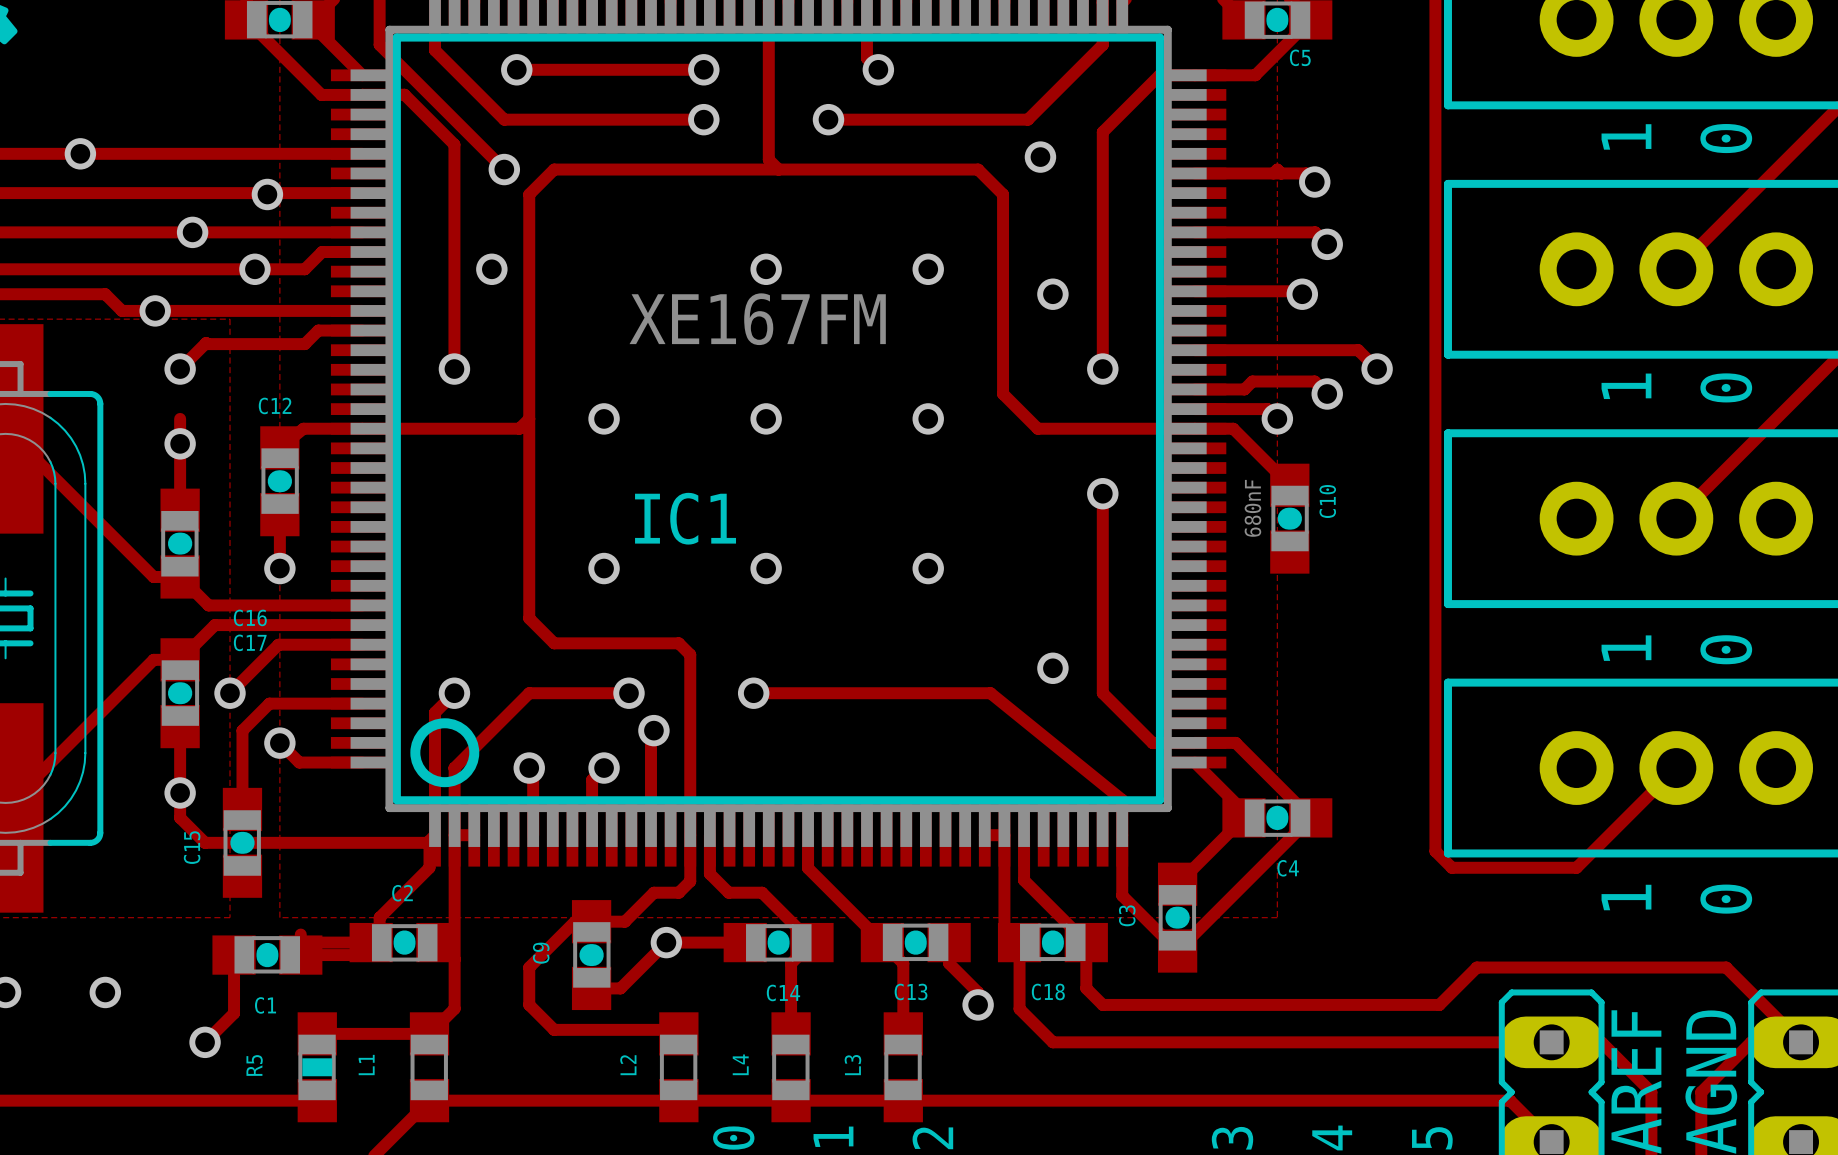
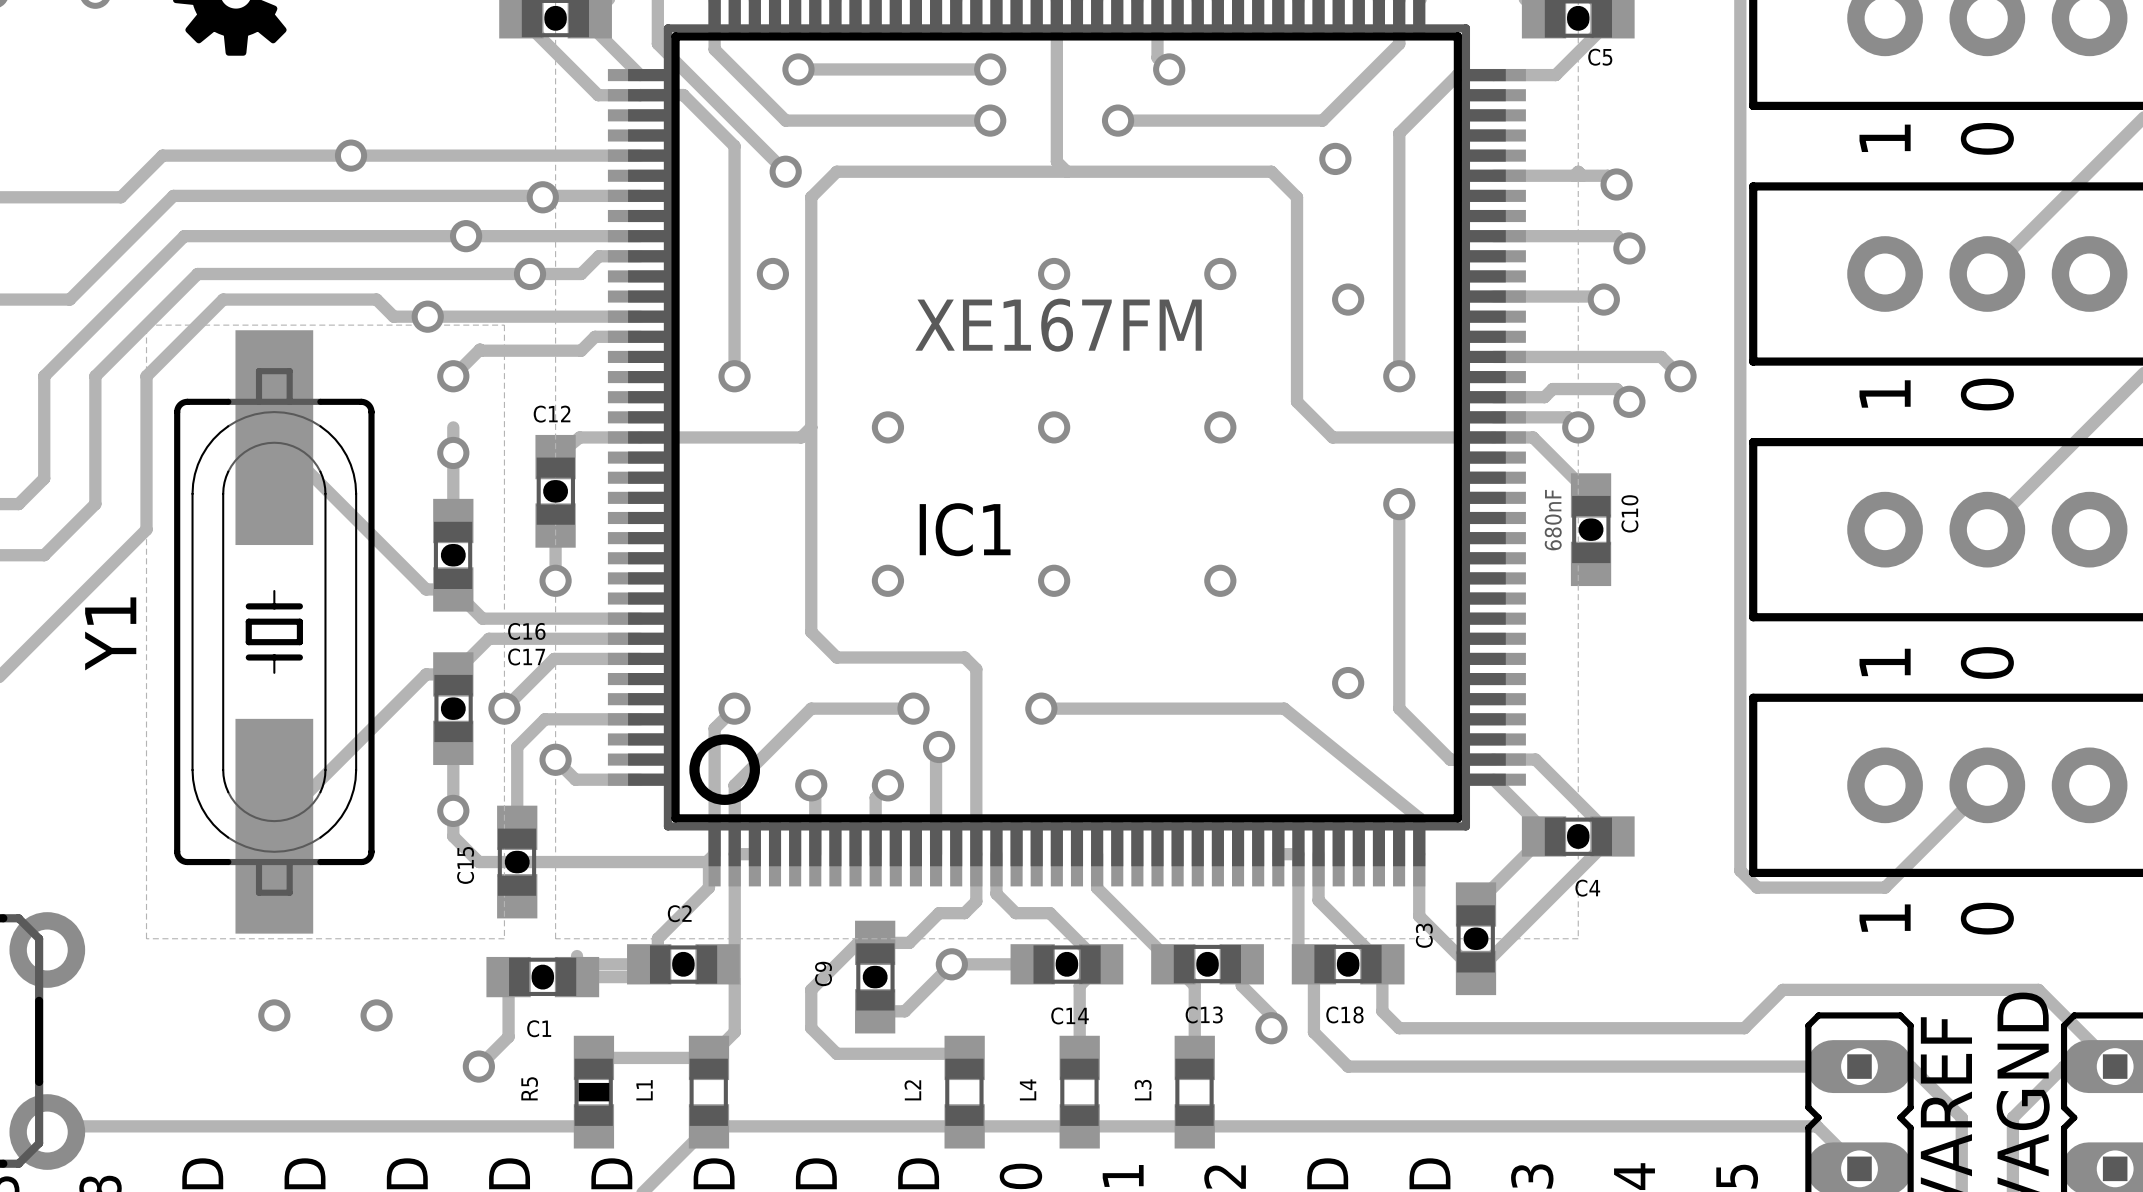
text position: 1 (1626, 136) -> 1 (1885, 138)
text position: 0 (1726, 138) -> 0 (1987, 138)
text position: 1 (1626, 386) -> 1 (1885, 393)
text position: 0 (1726, 387) -> 0 (1987, 394)
text position: 1 (1626, 648) -> 1 (1885, 662)
text position: 0 (1726, 649) -> 0 (1987, 663)
text position: 1 (1626, 897) -> 1 (1885, 918)
text position: 0 (1726, 899) -> 0 (1987, 918)

